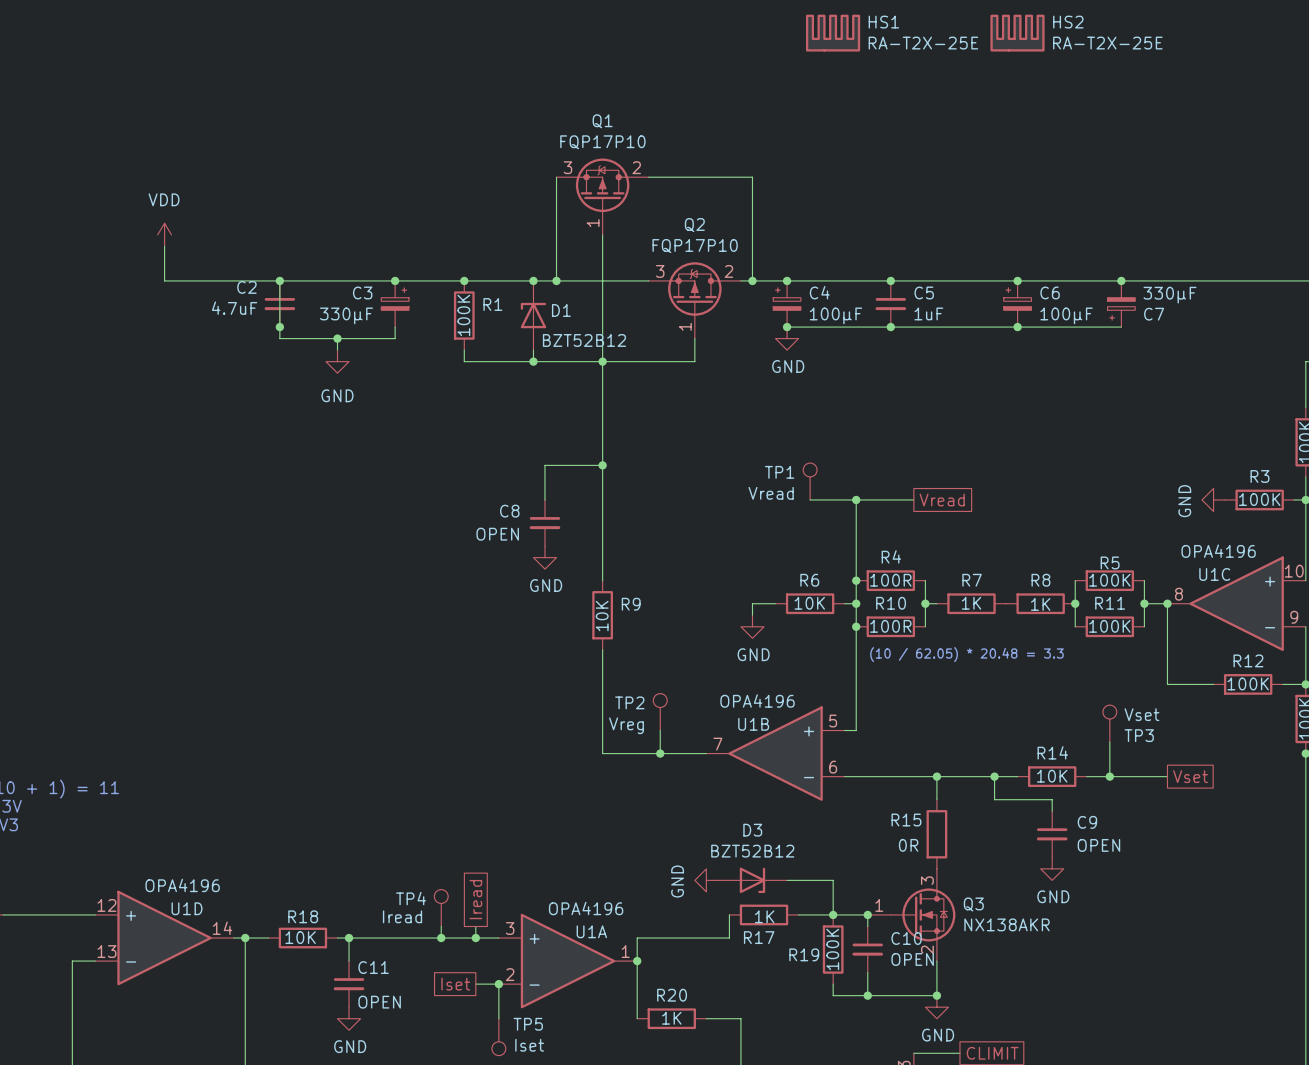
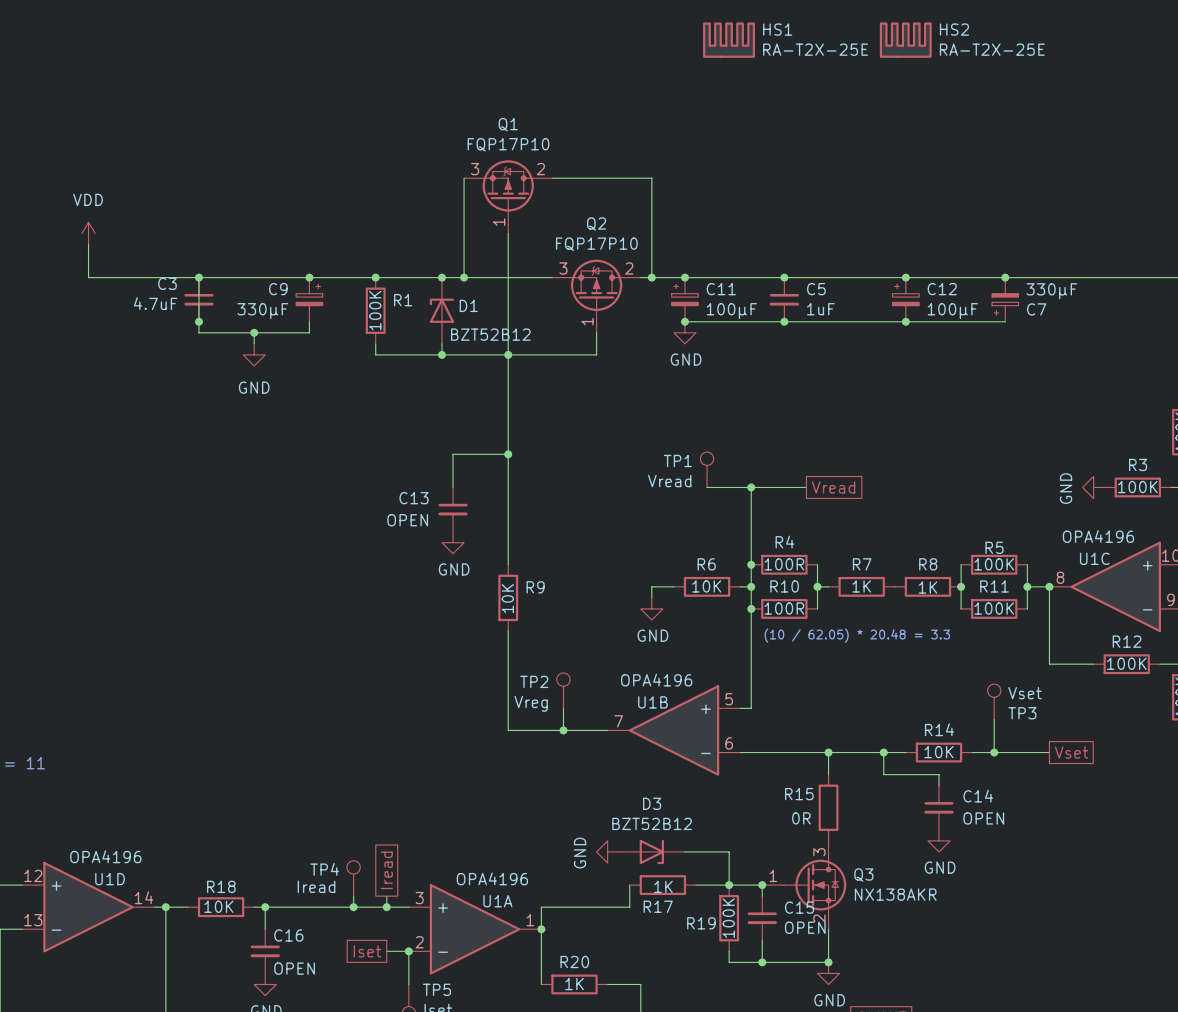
C2 name: C2 (246, 287) -> C3 (167, 283)
C3 name: C3 (362, 292) -> C9 (278, 289)
C4 name: C4 (819, 292) -> C11 (721, 289)
C6 name: C6 (1050, 292) -> C12 (942, 289)
C8 name: C8 (509, 511) -> C13 (414, 498)
C9 name: C9 (1087, 822) -> C14 (978, 796)
C10 name: C10 (906, 938) -> C15 (799, 907)
C11 name: C11 (373, 967) -> C16 (288, 935)

